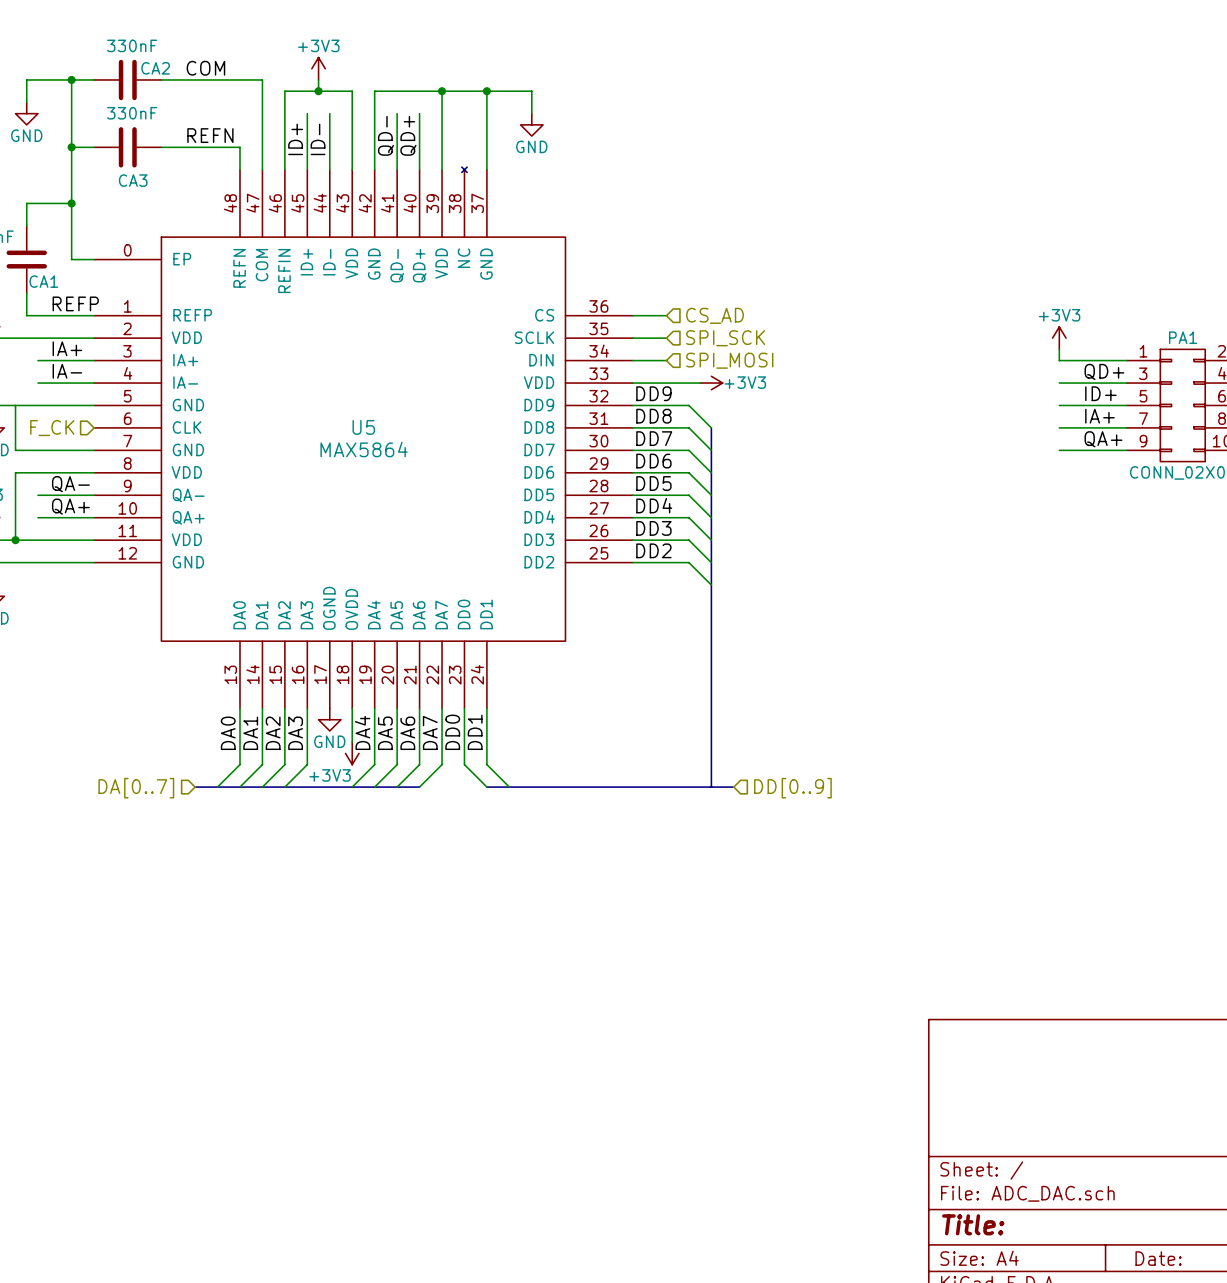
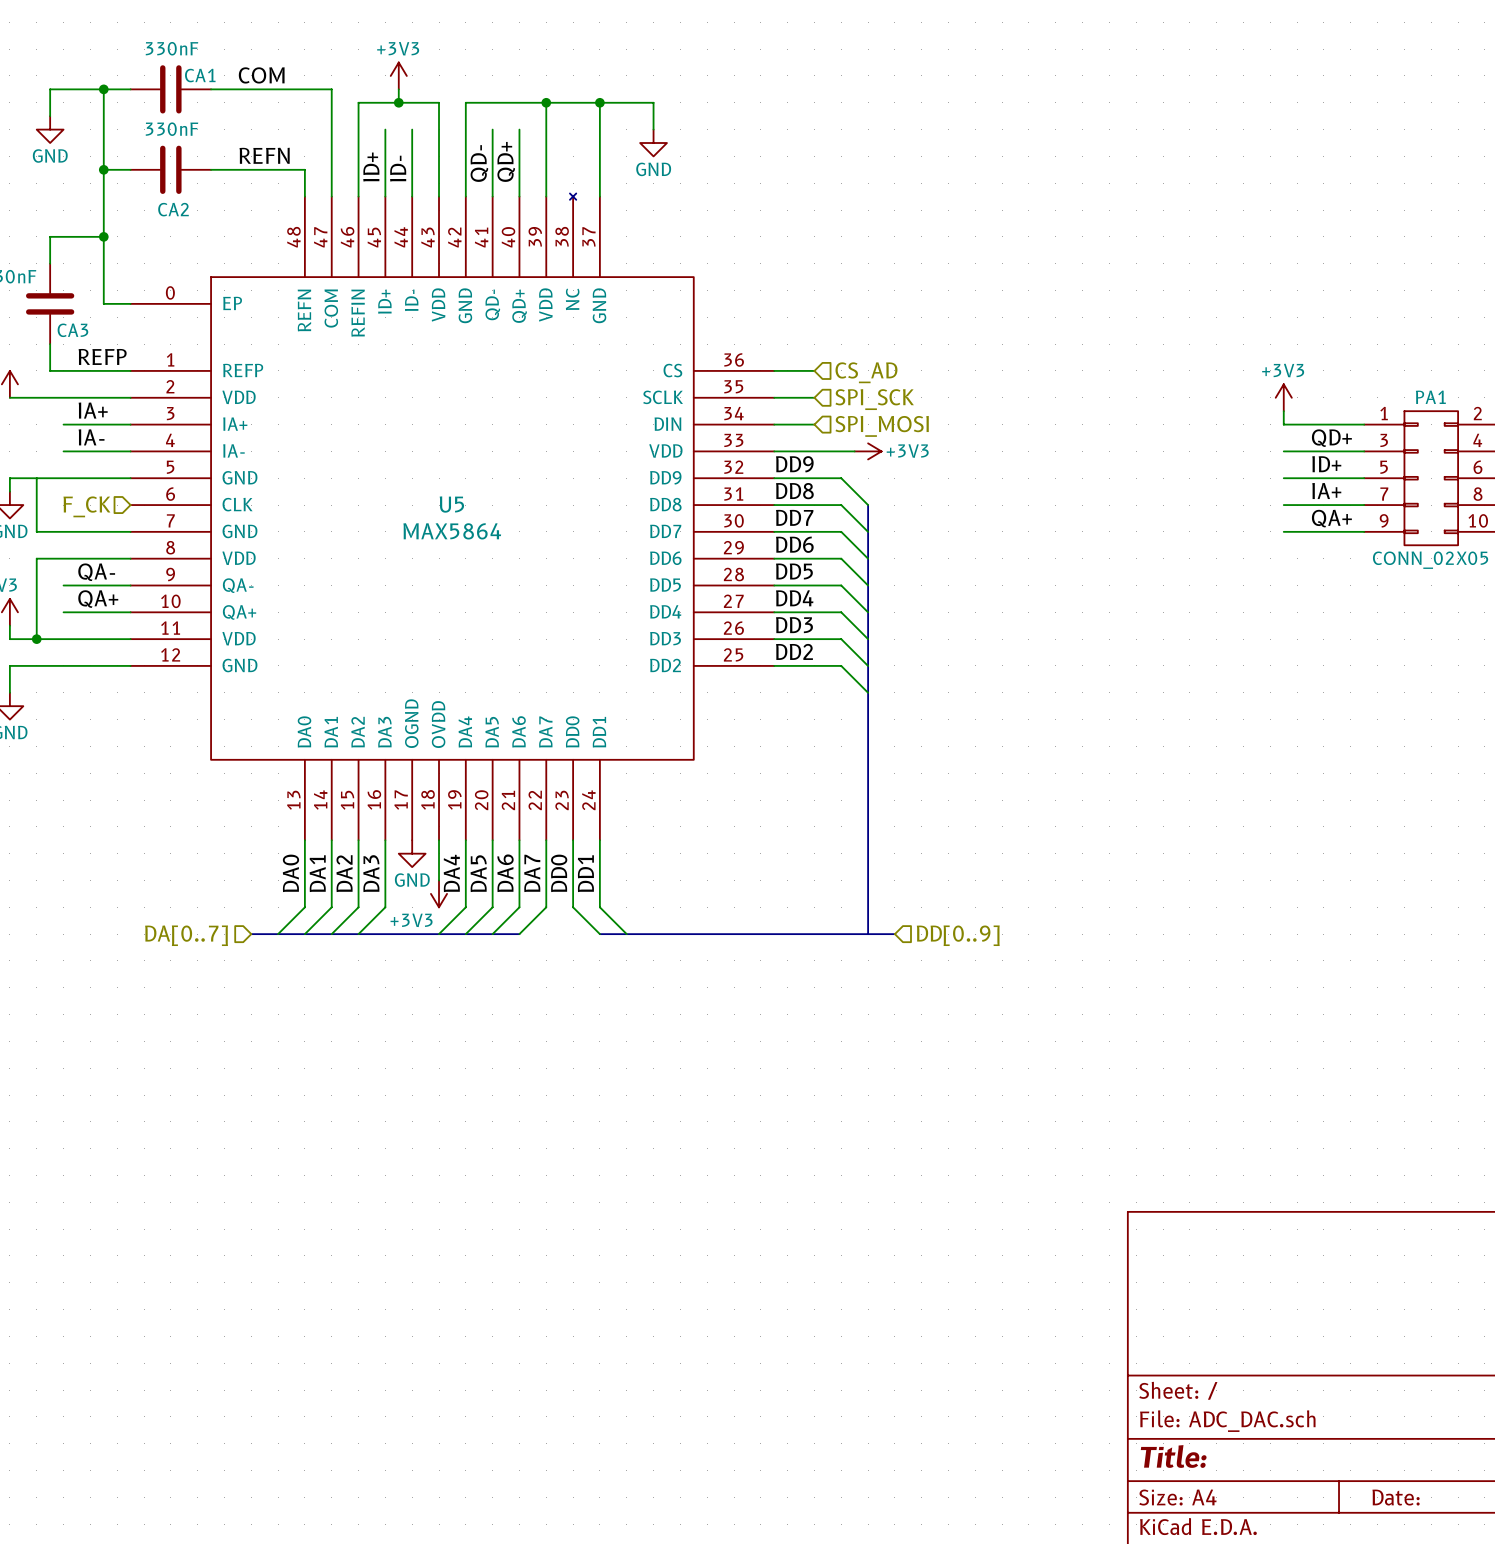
CA2 name: CA2 (155, 68) -> CA1 (200, 75)
CA3 name: CA3 (133, 180) -> CA2 (173, 209)
CA1 name: CA1 (43, 281) -> CA3 (72, 330)

